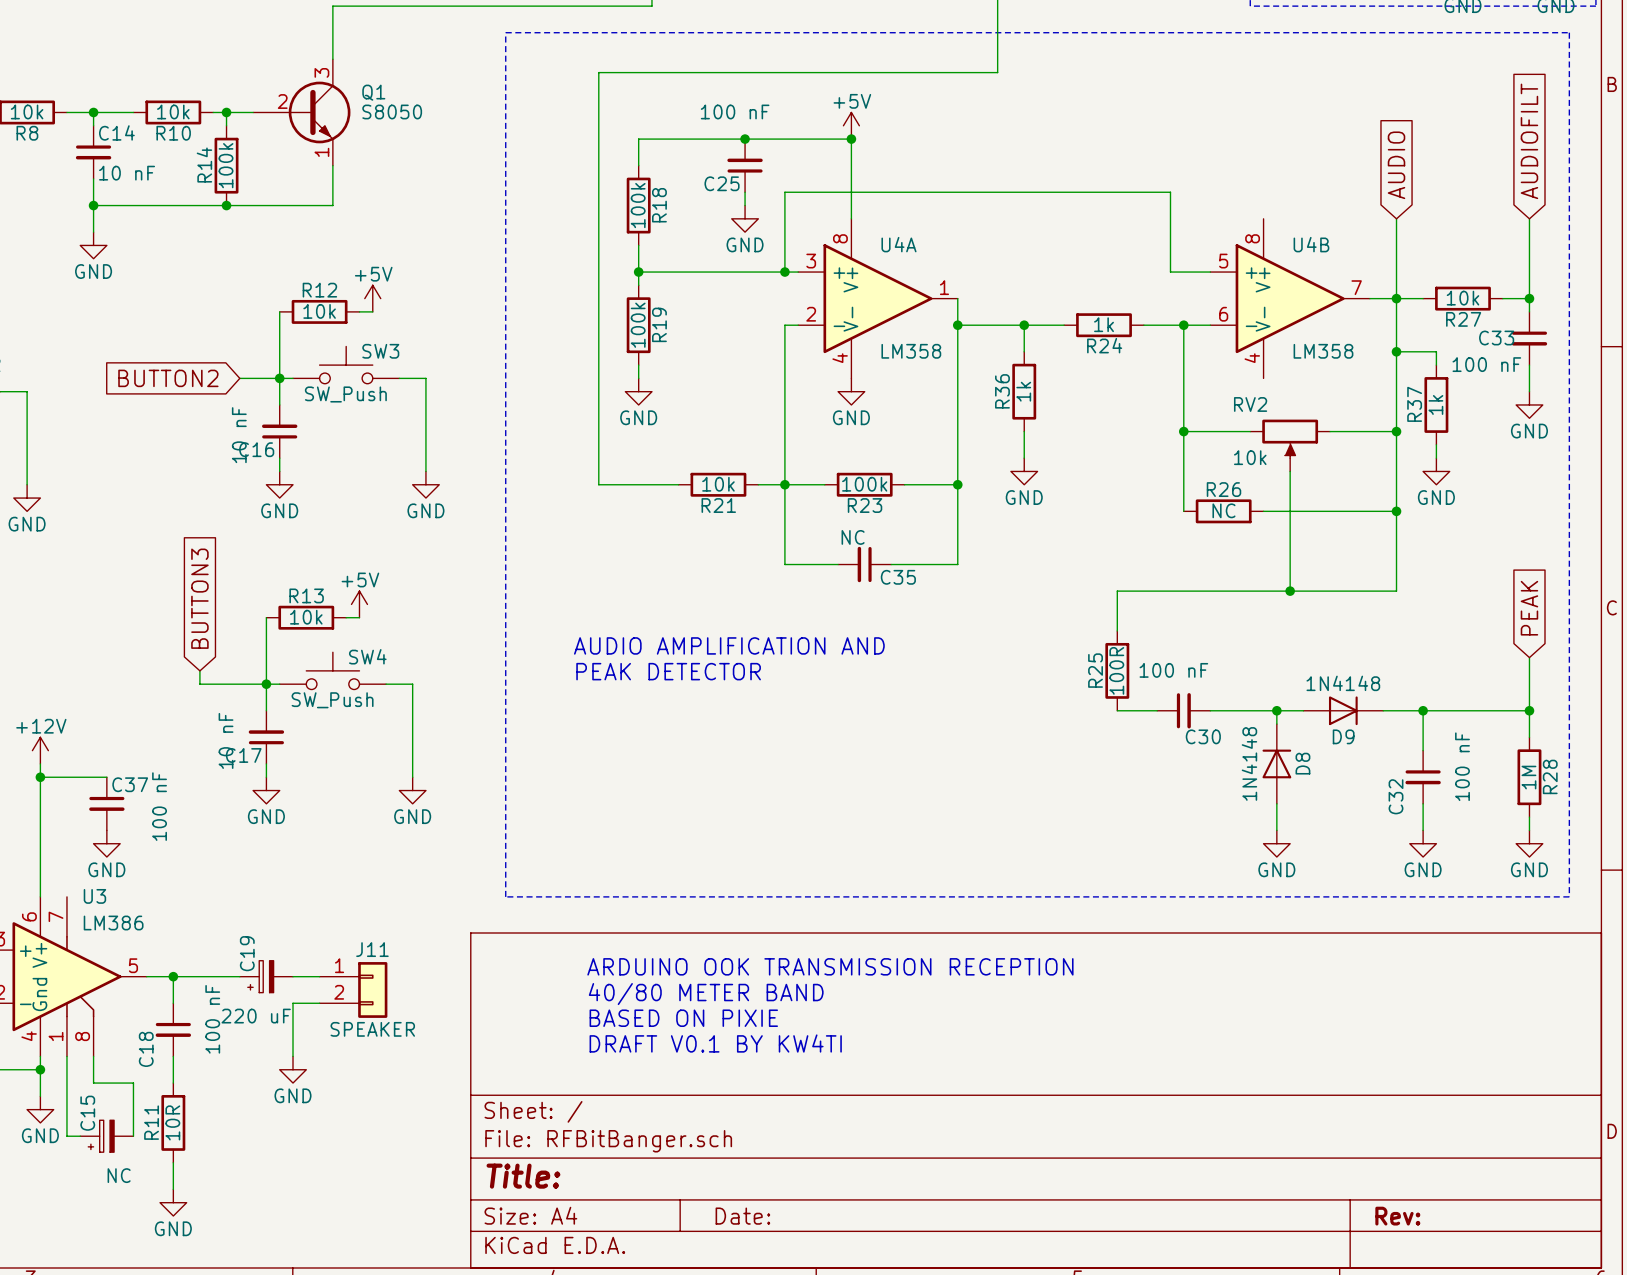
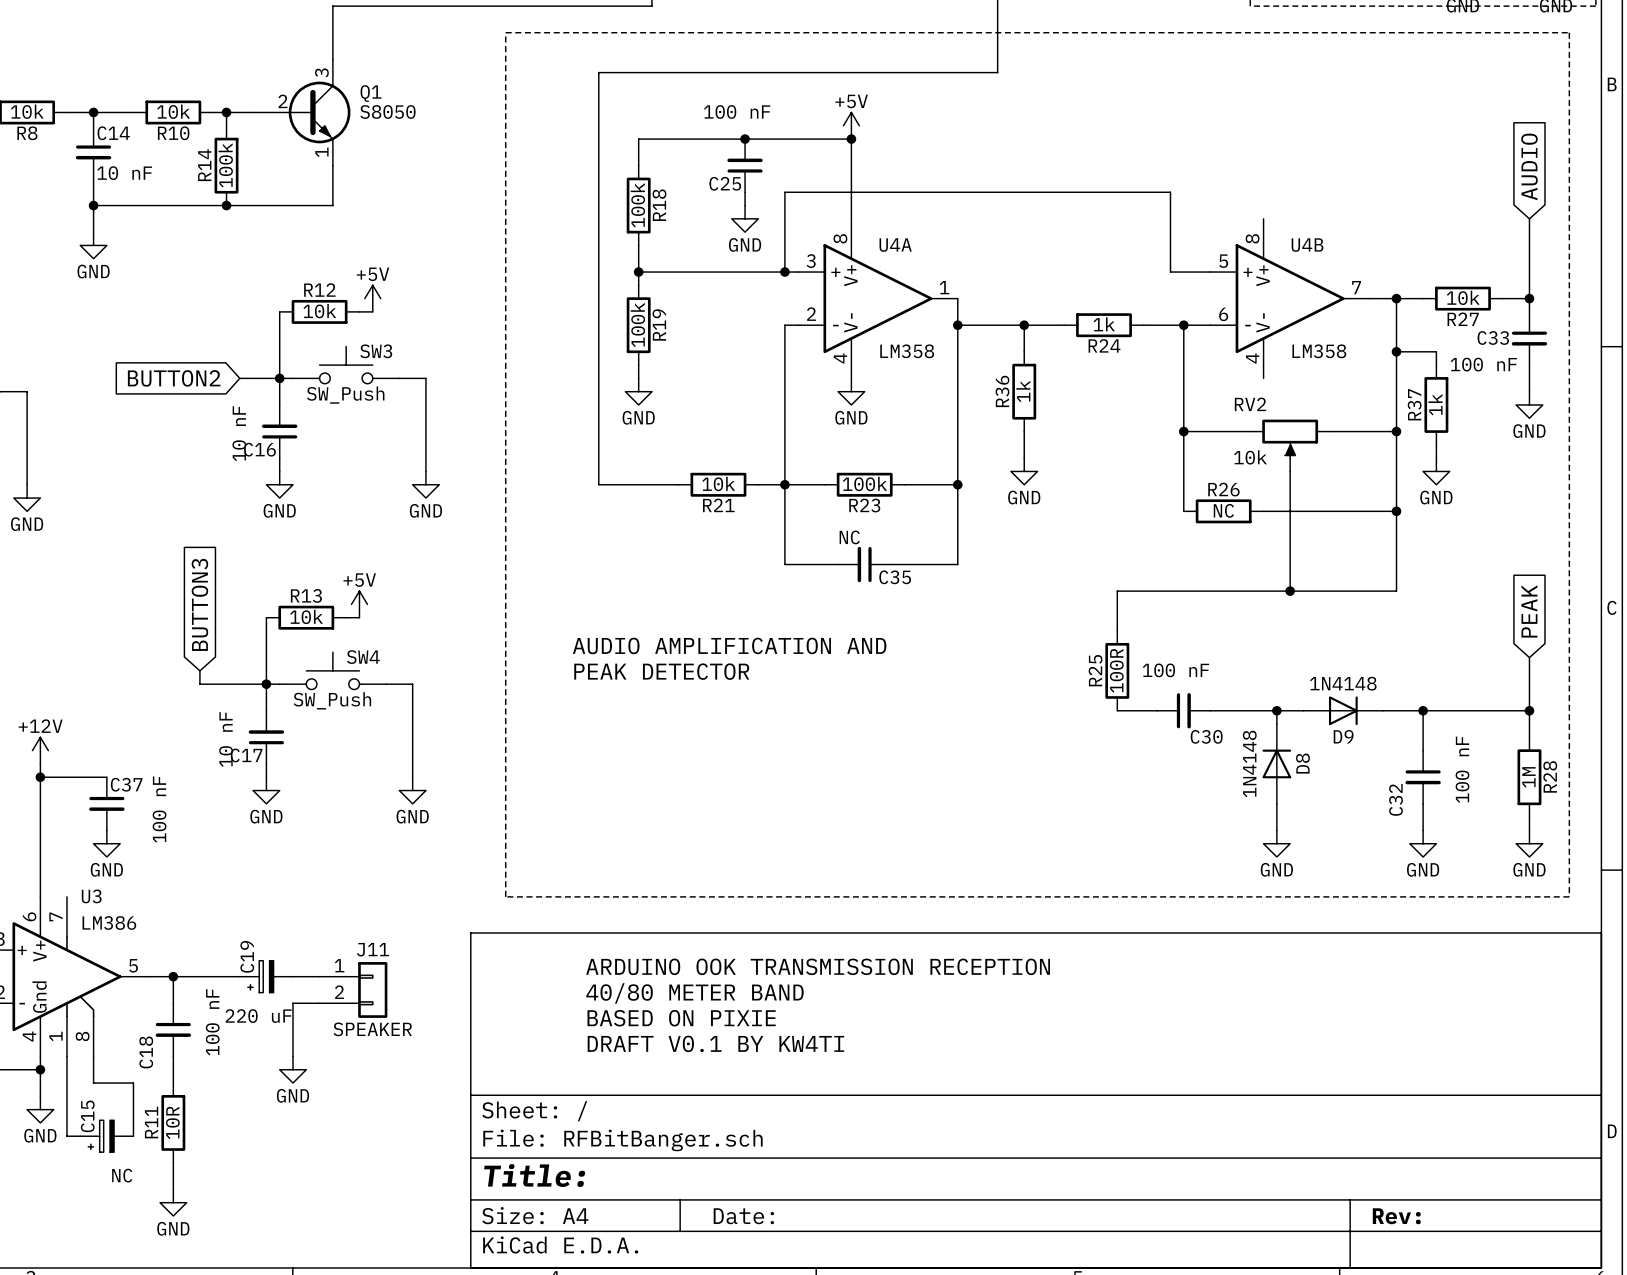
global label: AUDIOFILT (1529, 141) -> AUDIO (1529, 166)
global label: AUDIO (1396, 165) -> none
wire: (1396, 218) (1396, 298) -> none

